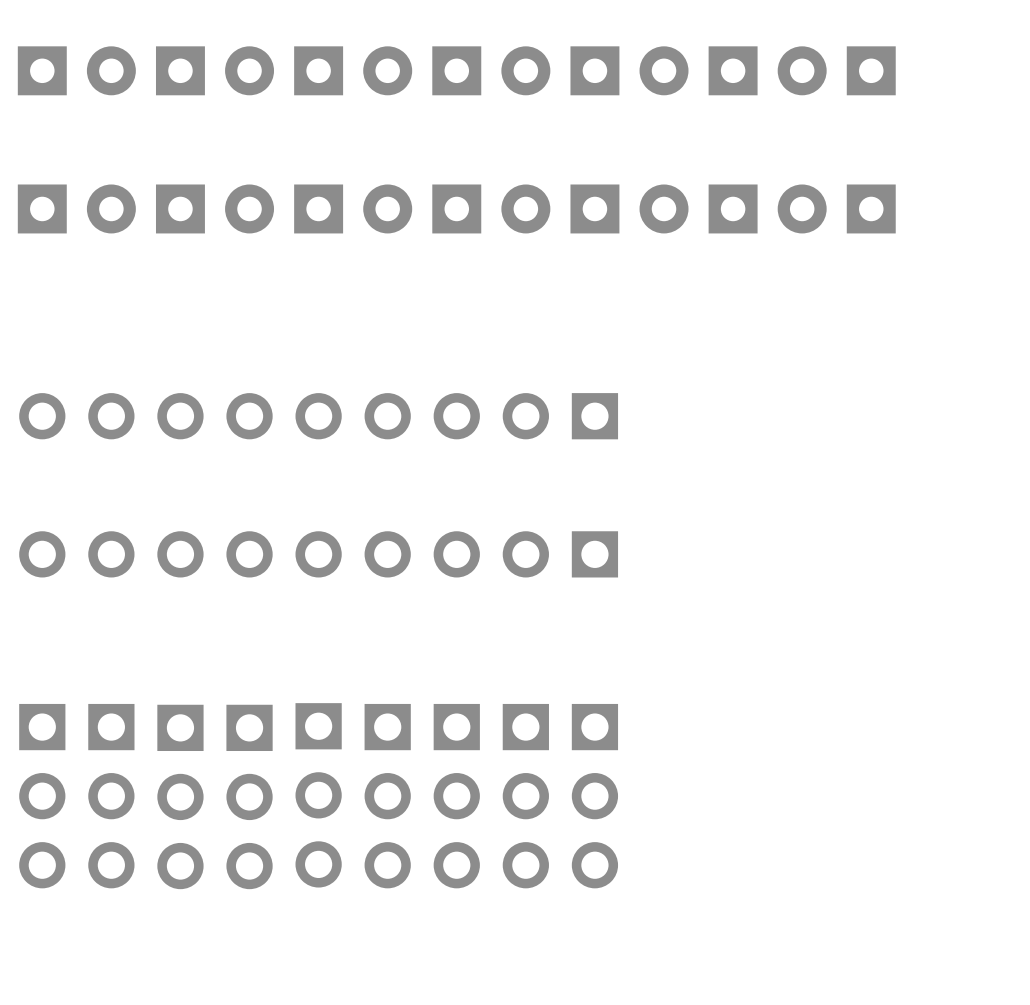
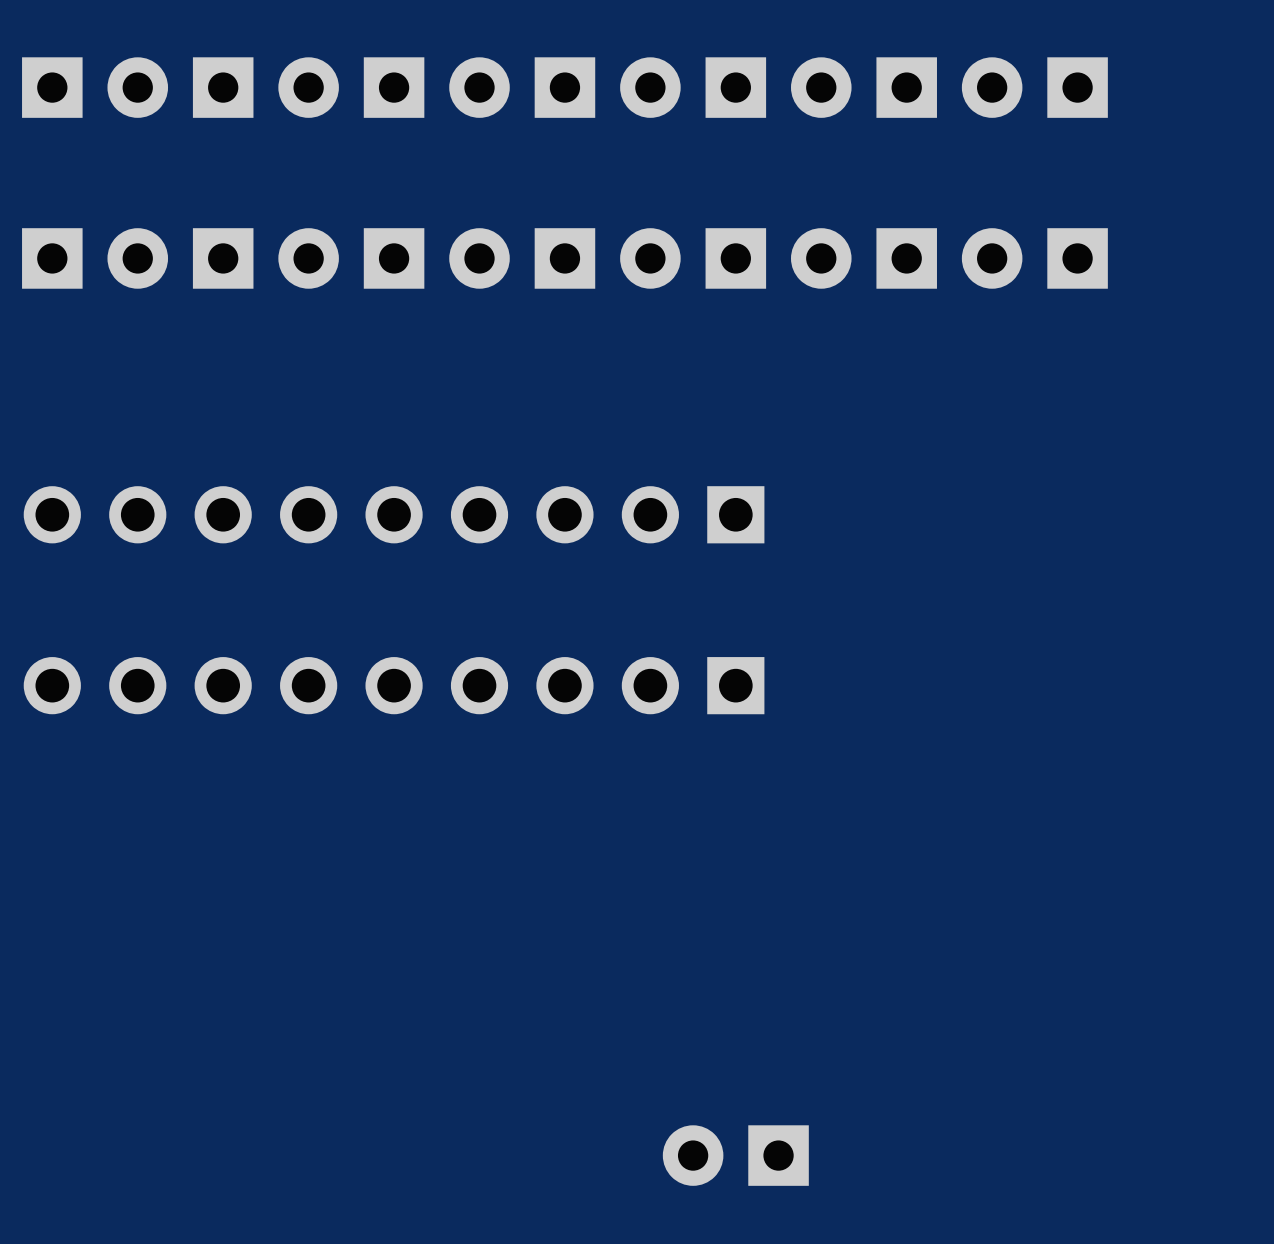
part: (318, 795) -> none
part: (42, 796) -> none
part: (111, 796) -> none
part: (180, 796) -> none
part: (249, 796) -> none
part: (387, 796) -> none
part: (456, 796) -> none
part: (525, 796) -> none
part: (594, 796) -> none
part: none -> (735, 1155)

